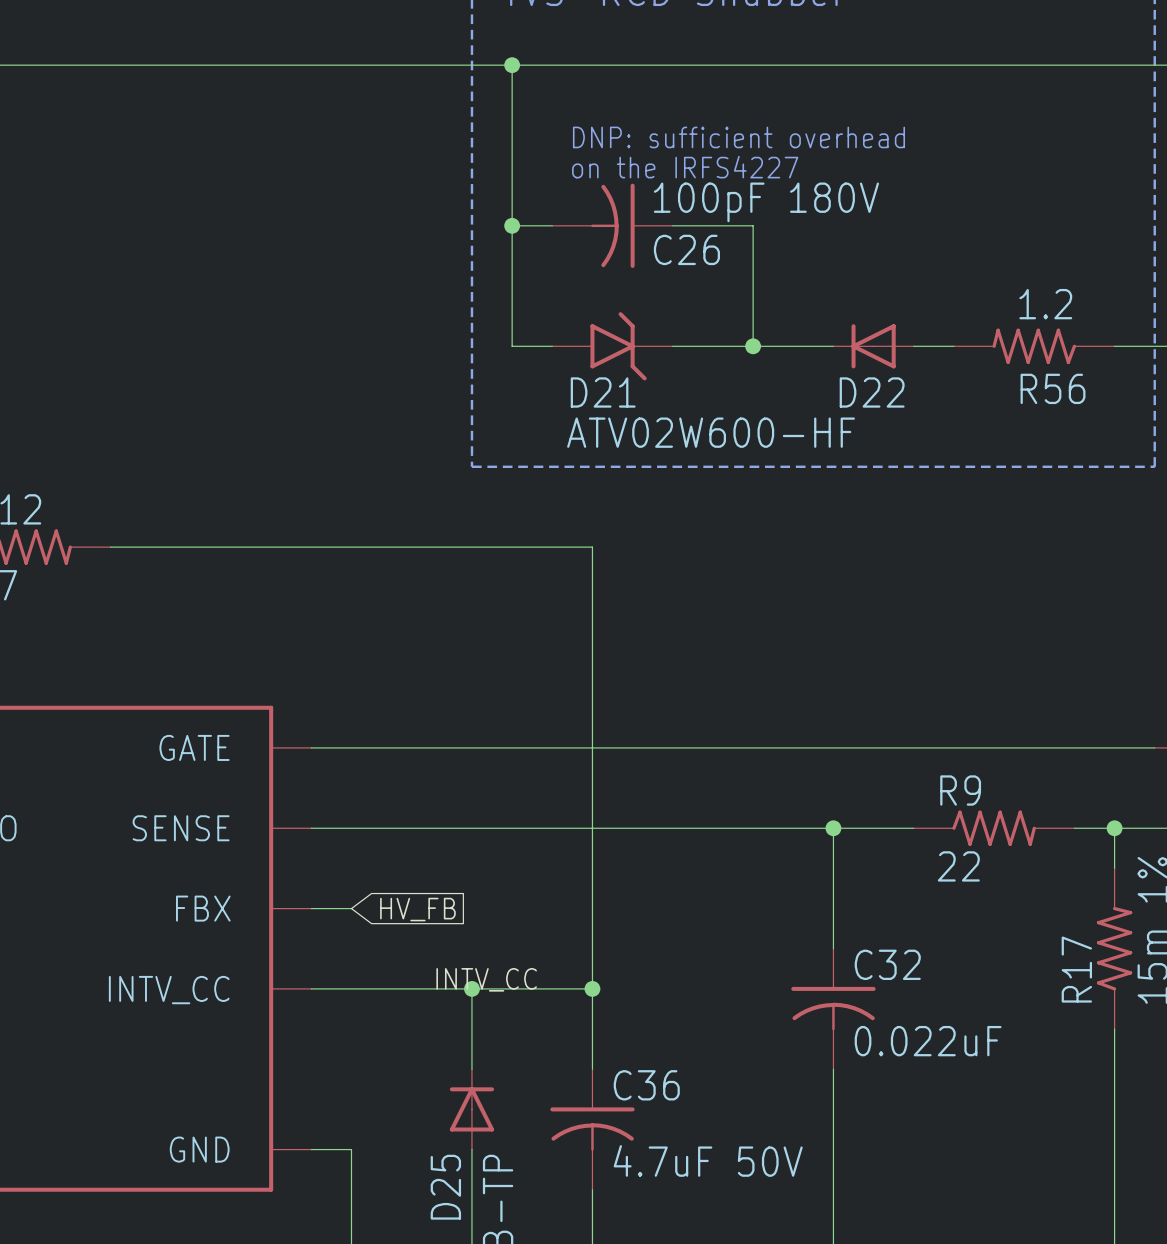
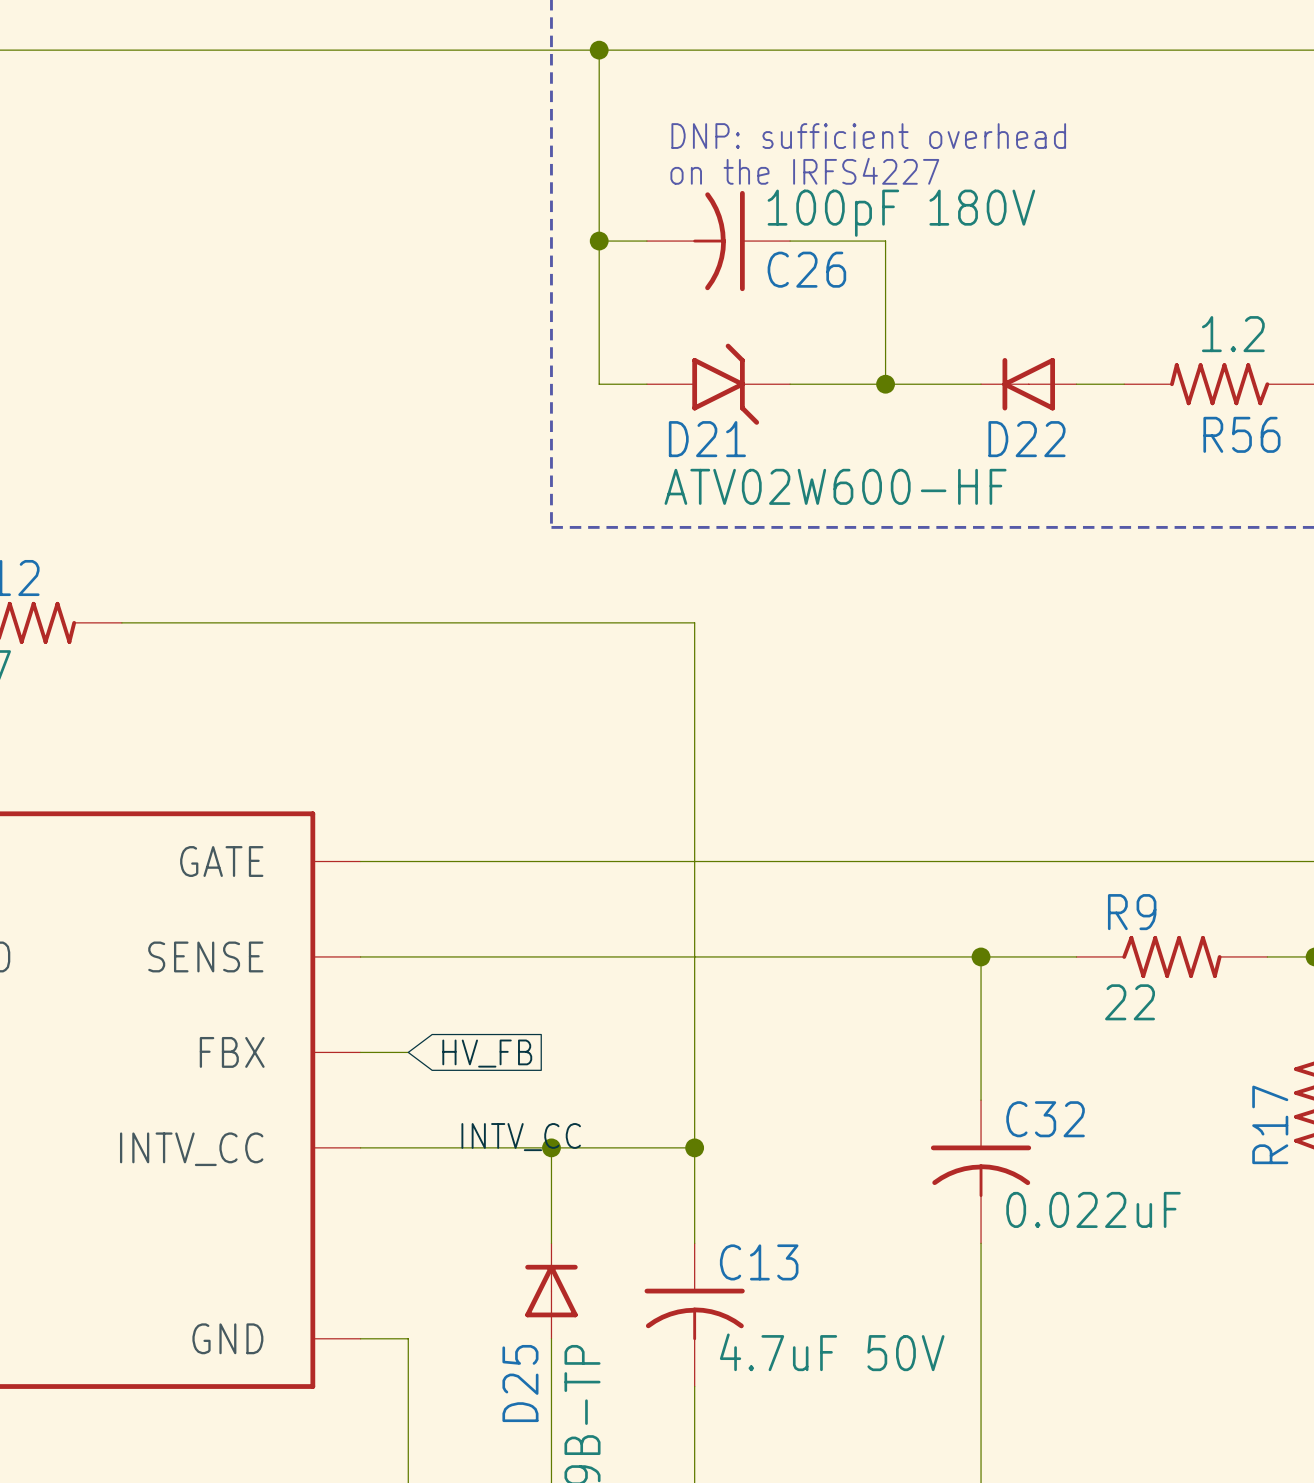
label position: INTV_CC (486, 979) -> INTV_CC (521, 1137)
C36 name: C36 (646, 1085) -> C13 (759, 1262)

